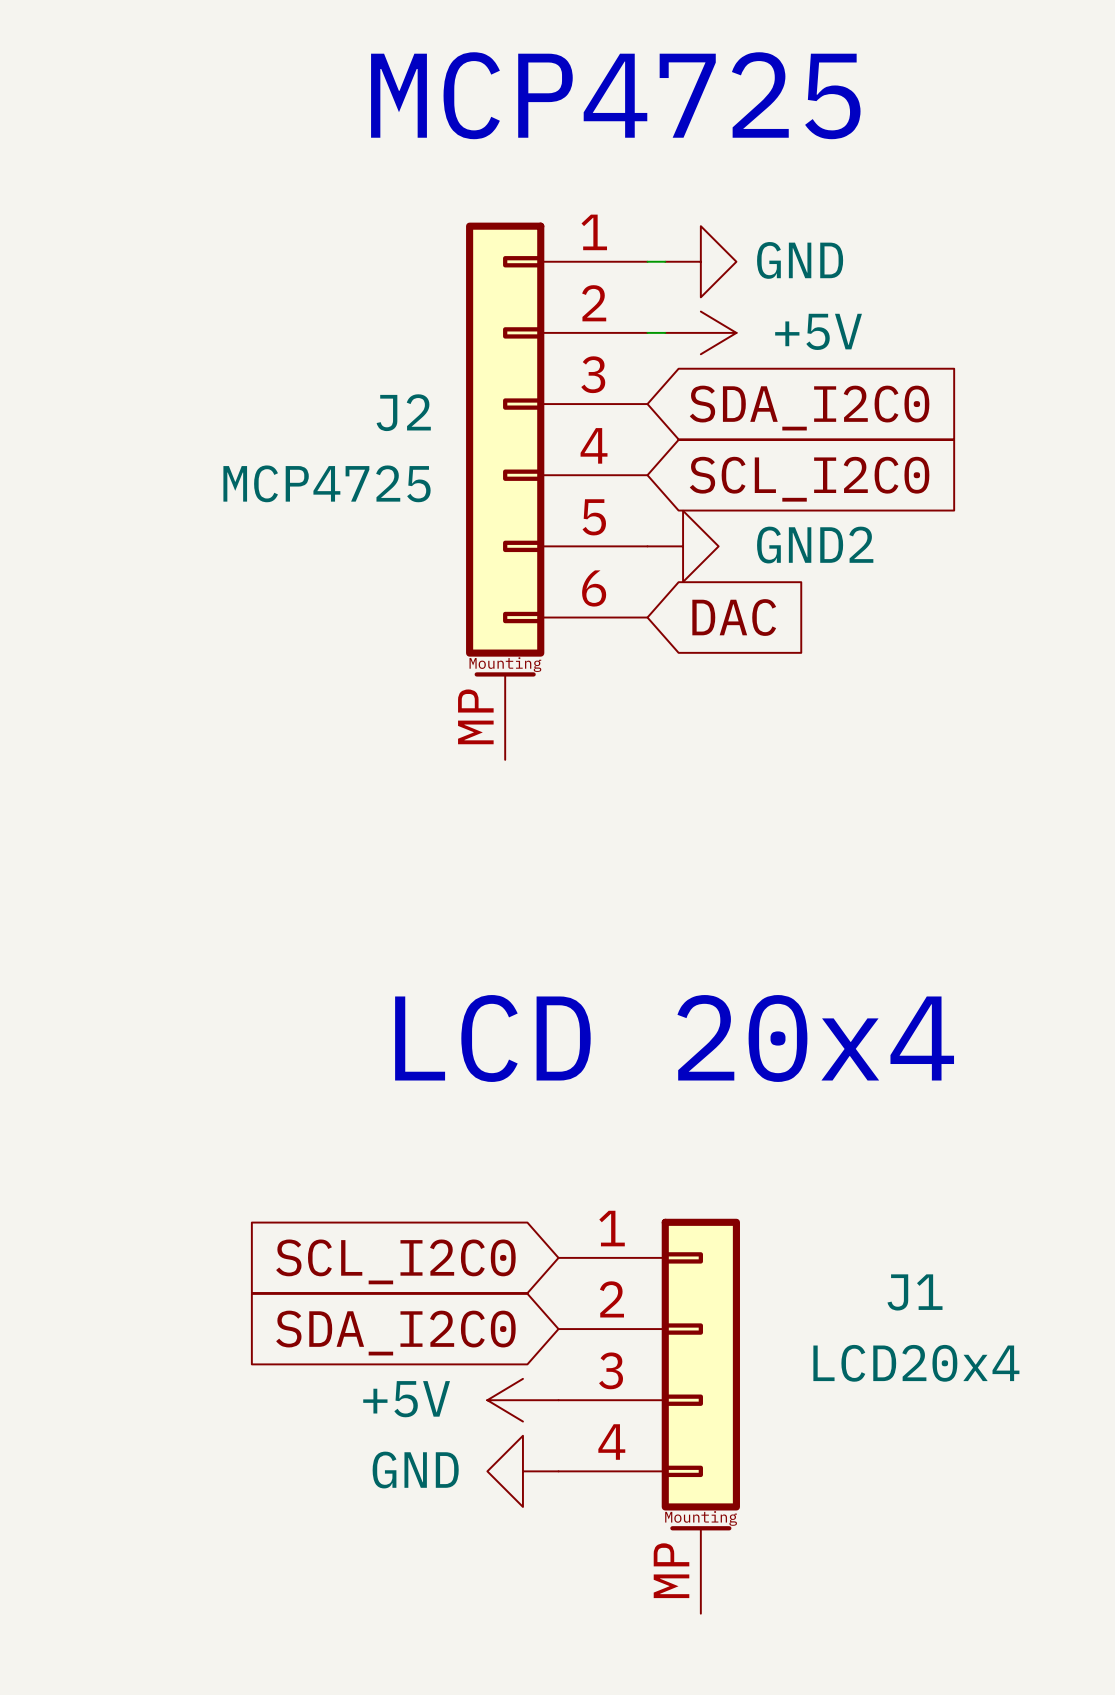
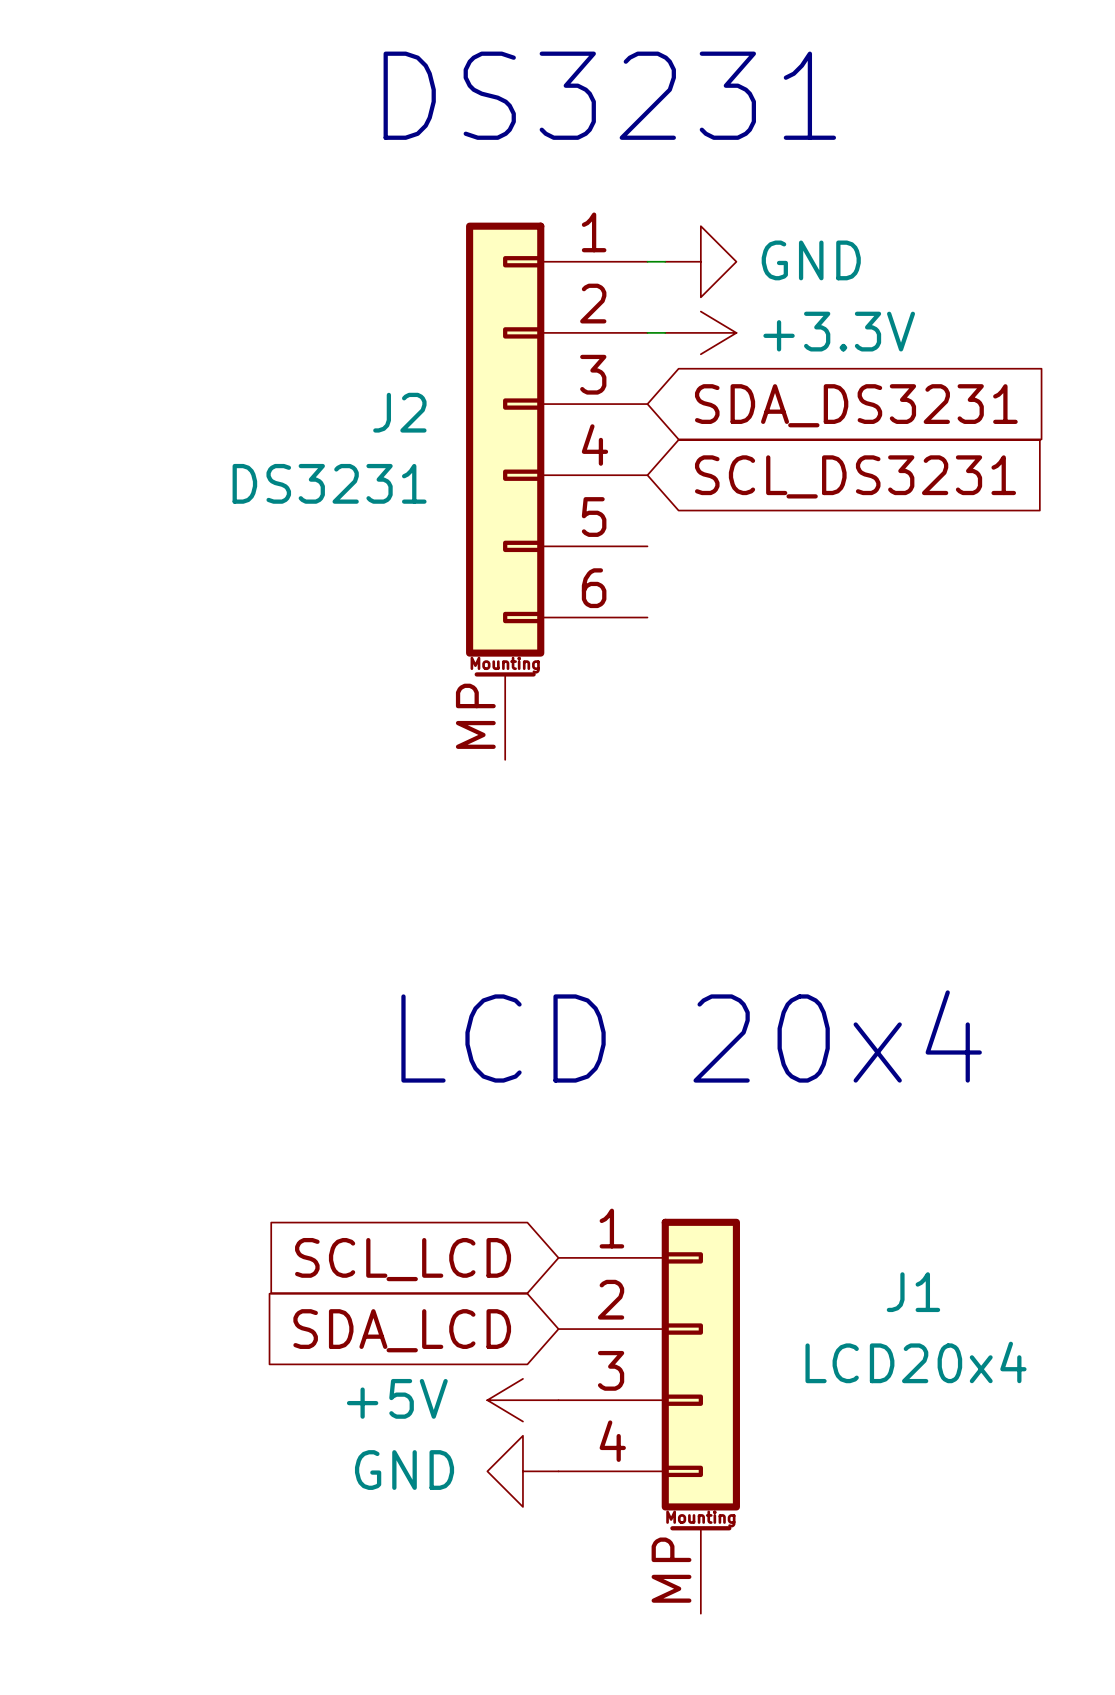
text: MCP4725 (615, 95) -> DS3231 (609, 95)
power symbol: +5V (700, 332) -> +3.3V (700, 332)
global label: SDA_I2C0 (809, 408) -> SDA_DS3231 (856, 405)
global label: SCL_I2C0 (809, 479) -> SCL_DS3231 (855, 476)
J2 value: MCP4725 (327, 483) -> DS3231 (329, 483)
power symbol: GND2 (683, 546) -> none
global label: DAC (734, 617) -> none
global label: SCL_I2C0 (395, 1261) -> SCL_LCD (403, 1259)
global label: SDA_I2C0 (395, 1333) -> SDA_LCD (402, 1330)

